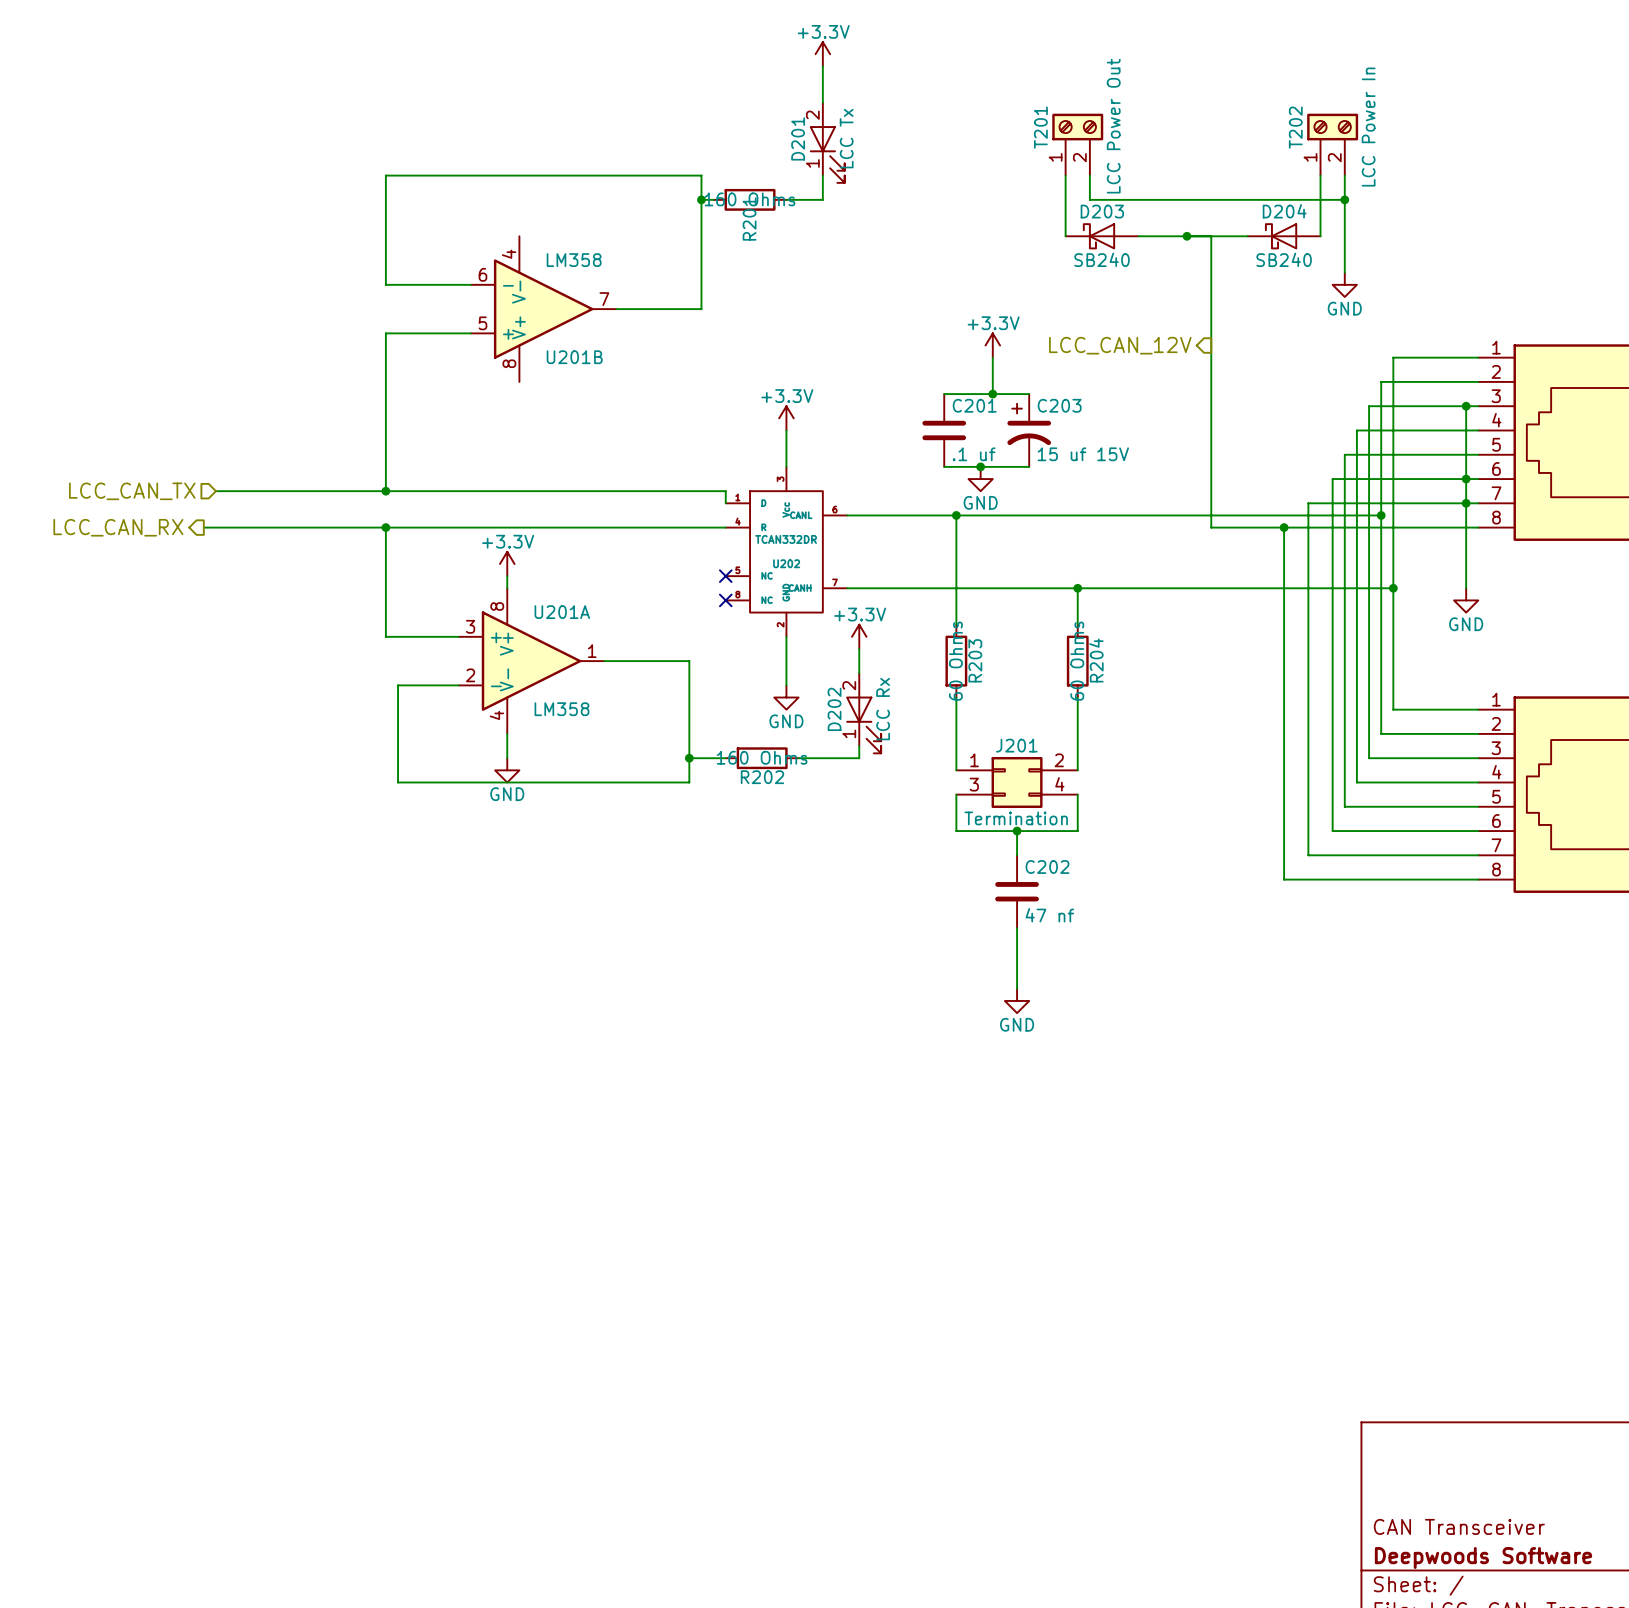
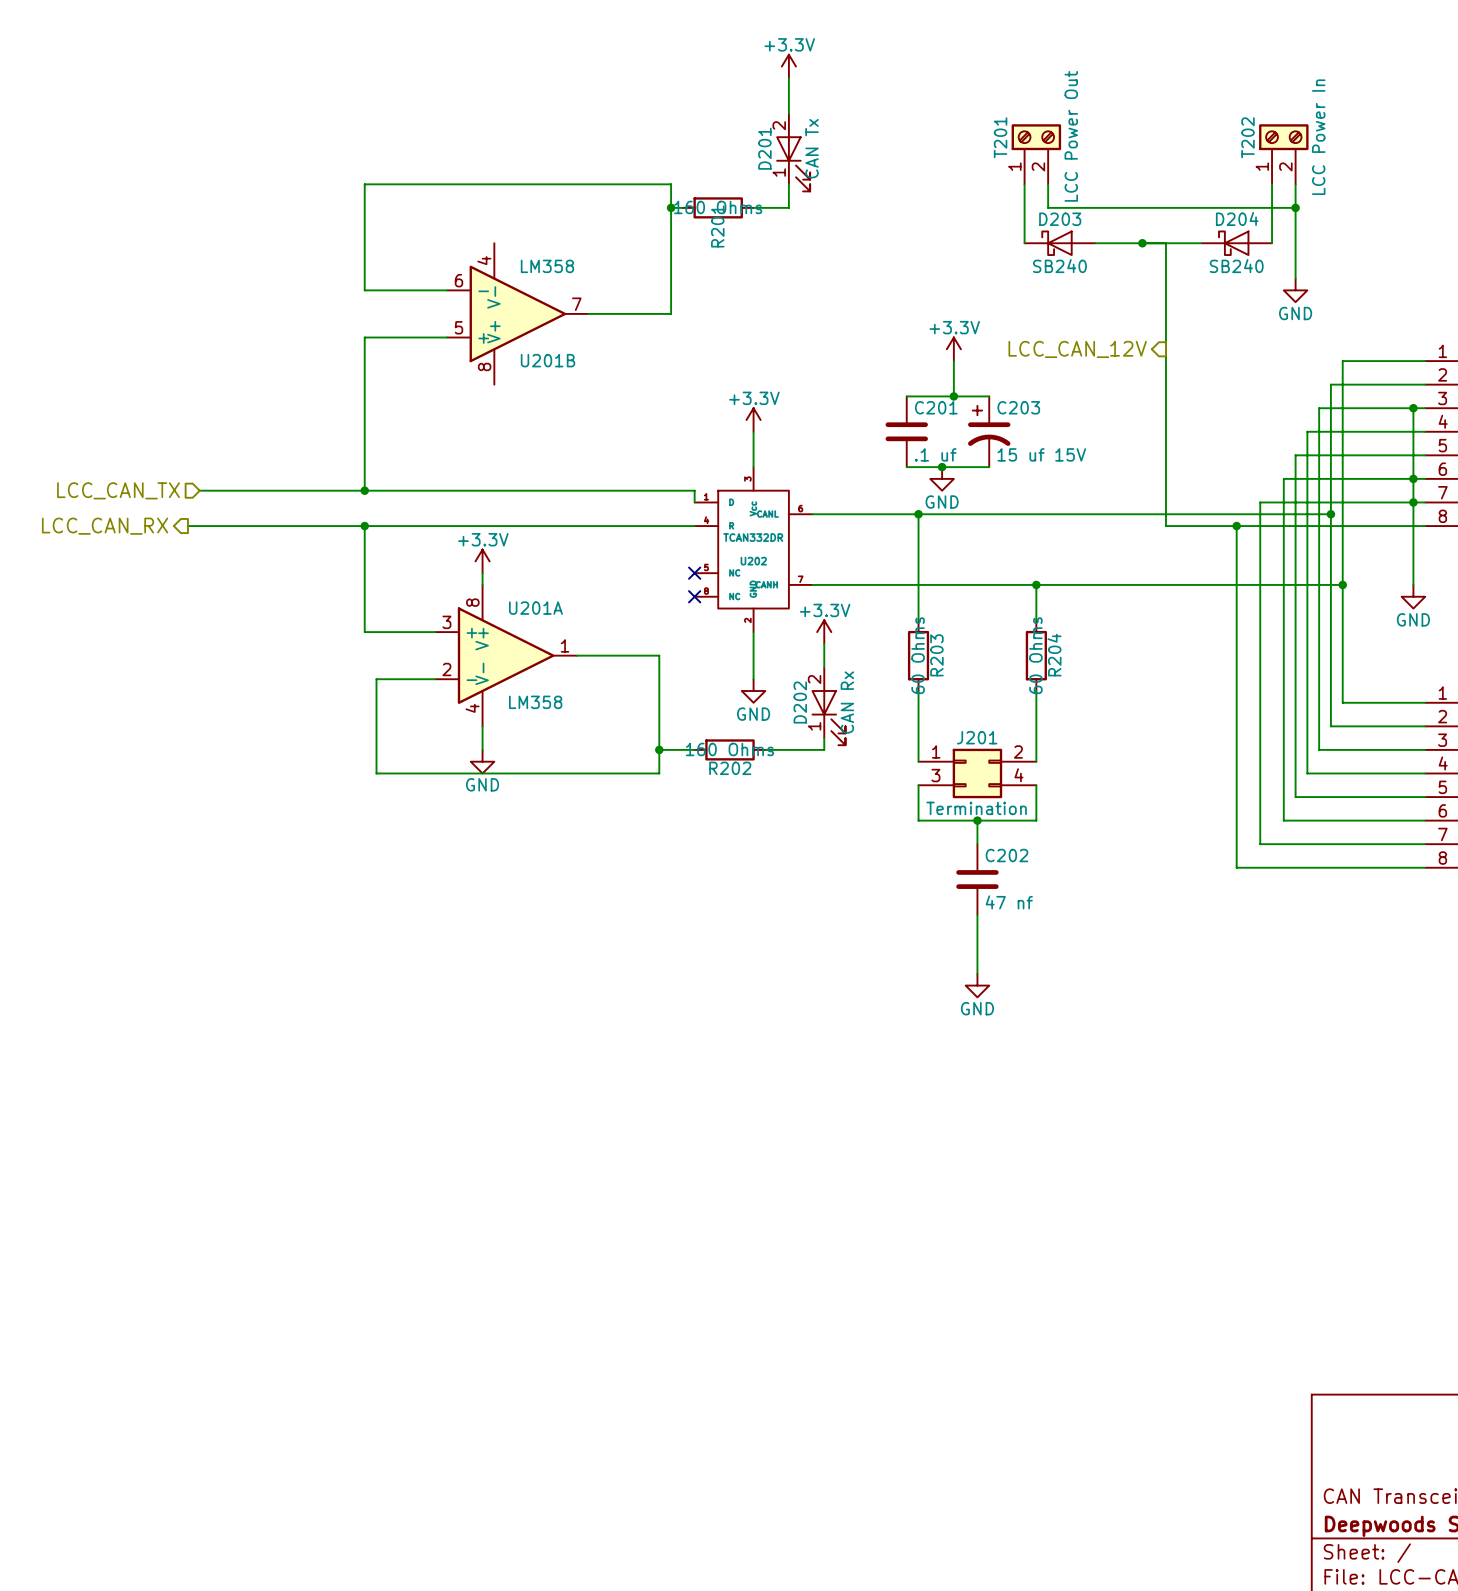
D201 value: LCC Tx (846, 138) -> CAN Tx (812, 148)
D202 value: LCC Rx (883, 709) -> CAN Rx (847, 702)

